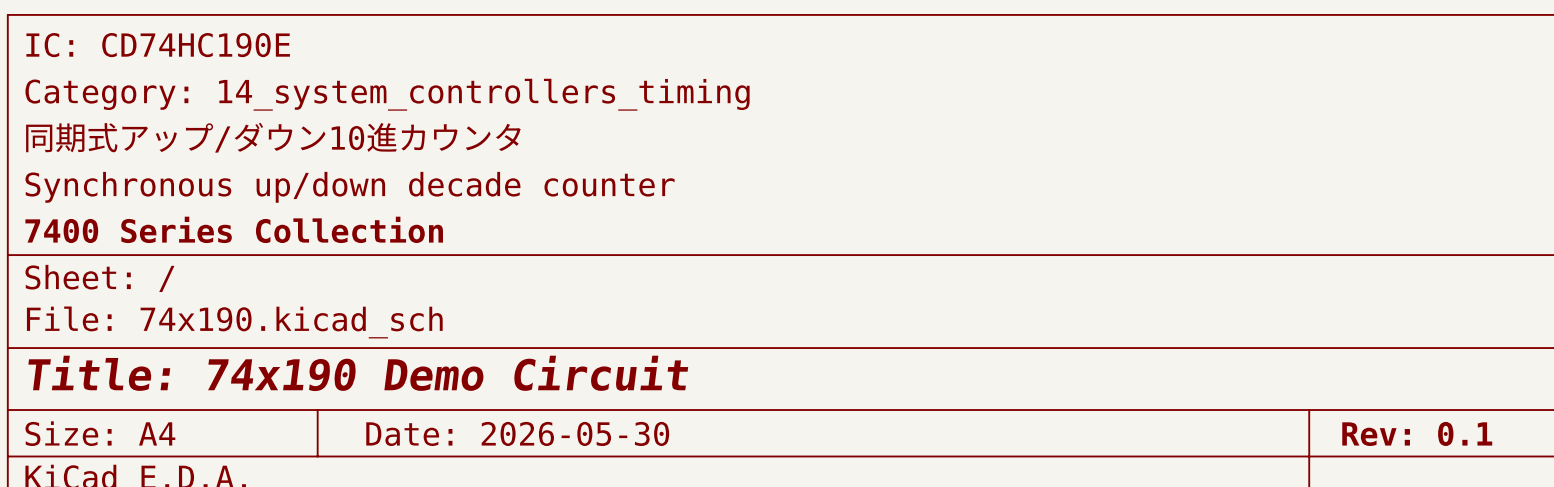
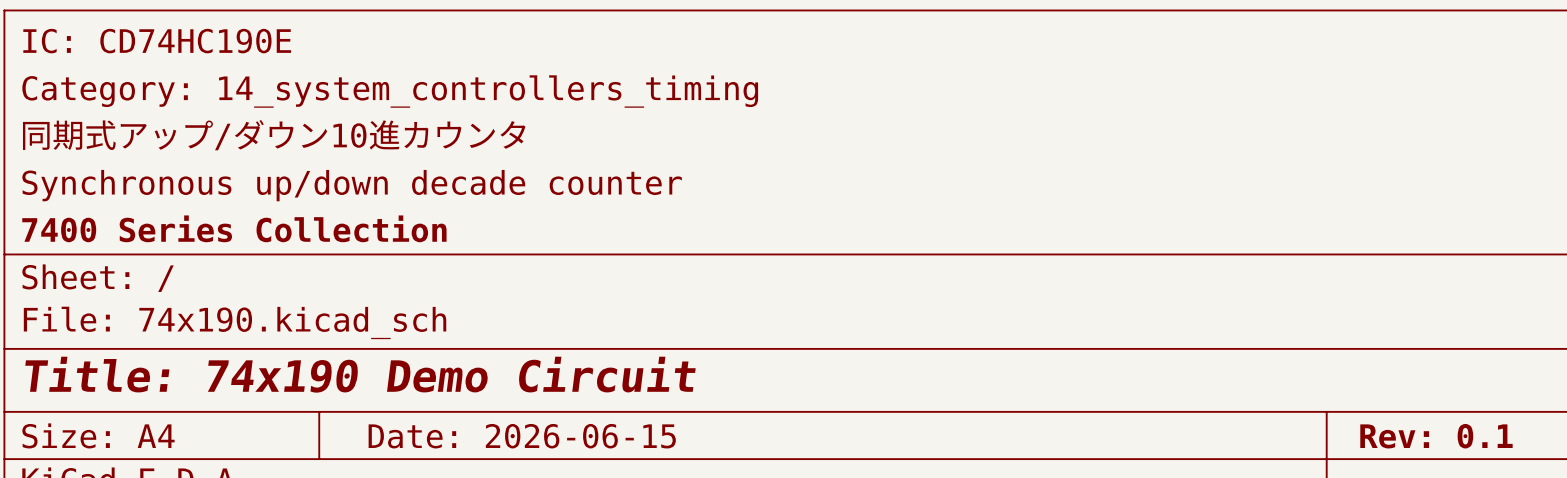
title block: Date: 2026-05-30 (517, 433) -> Date: 2026-06-15 (522, 436)

